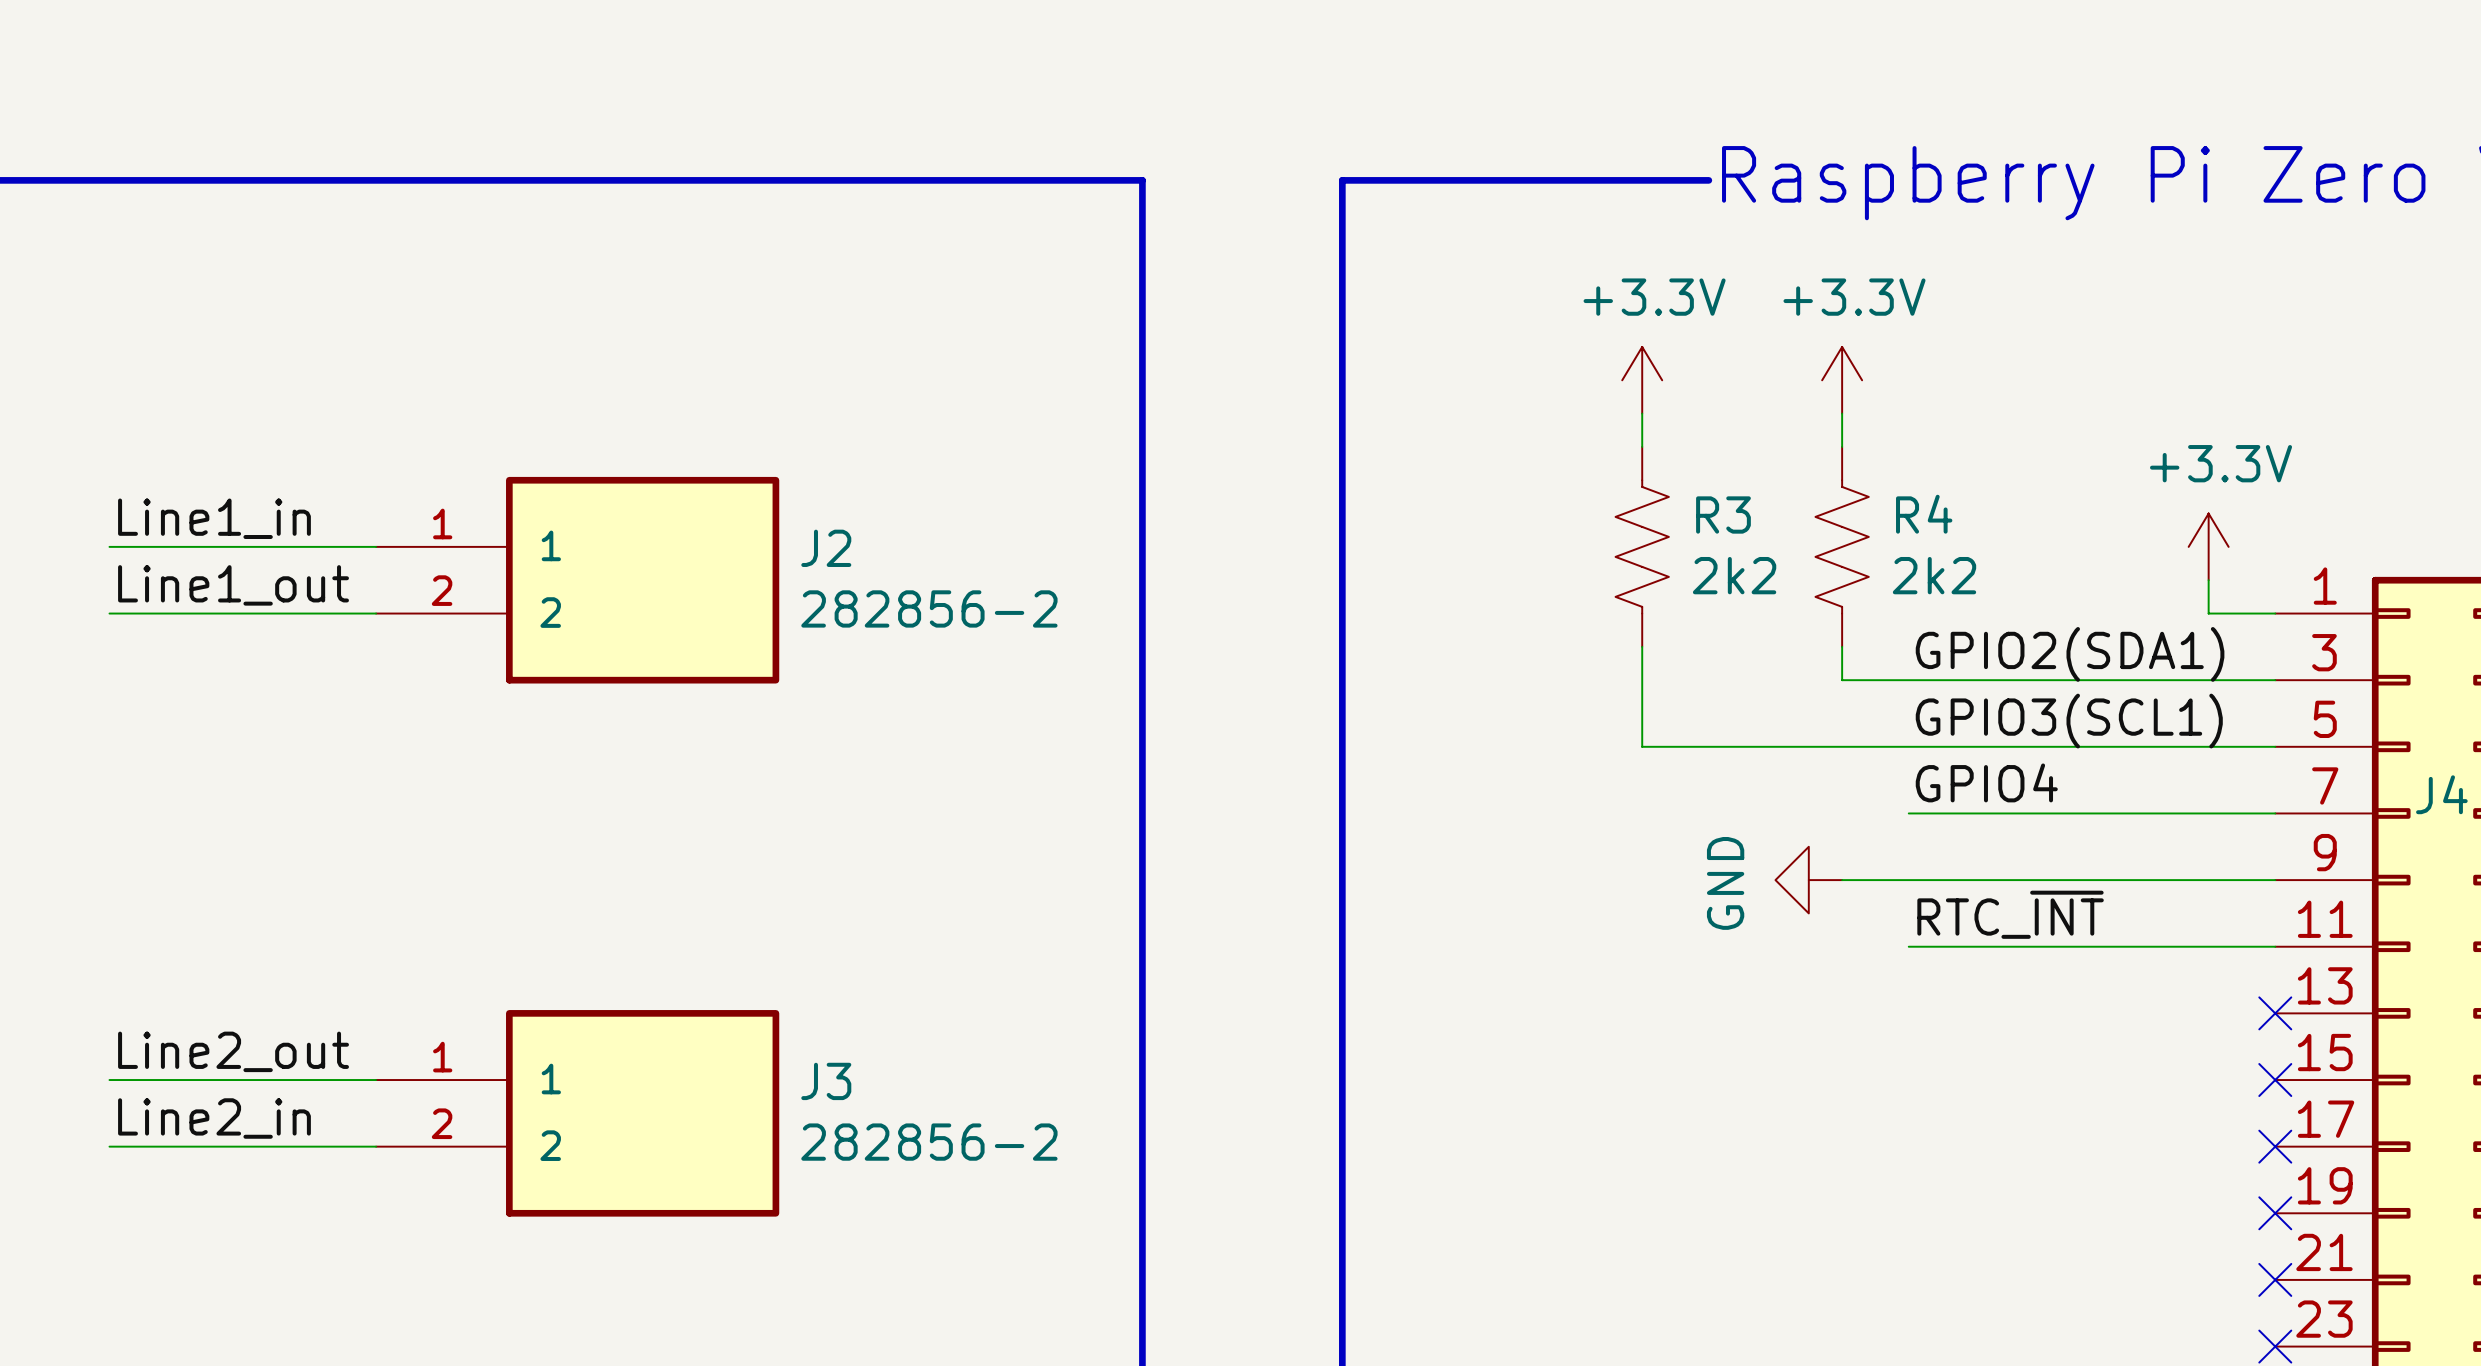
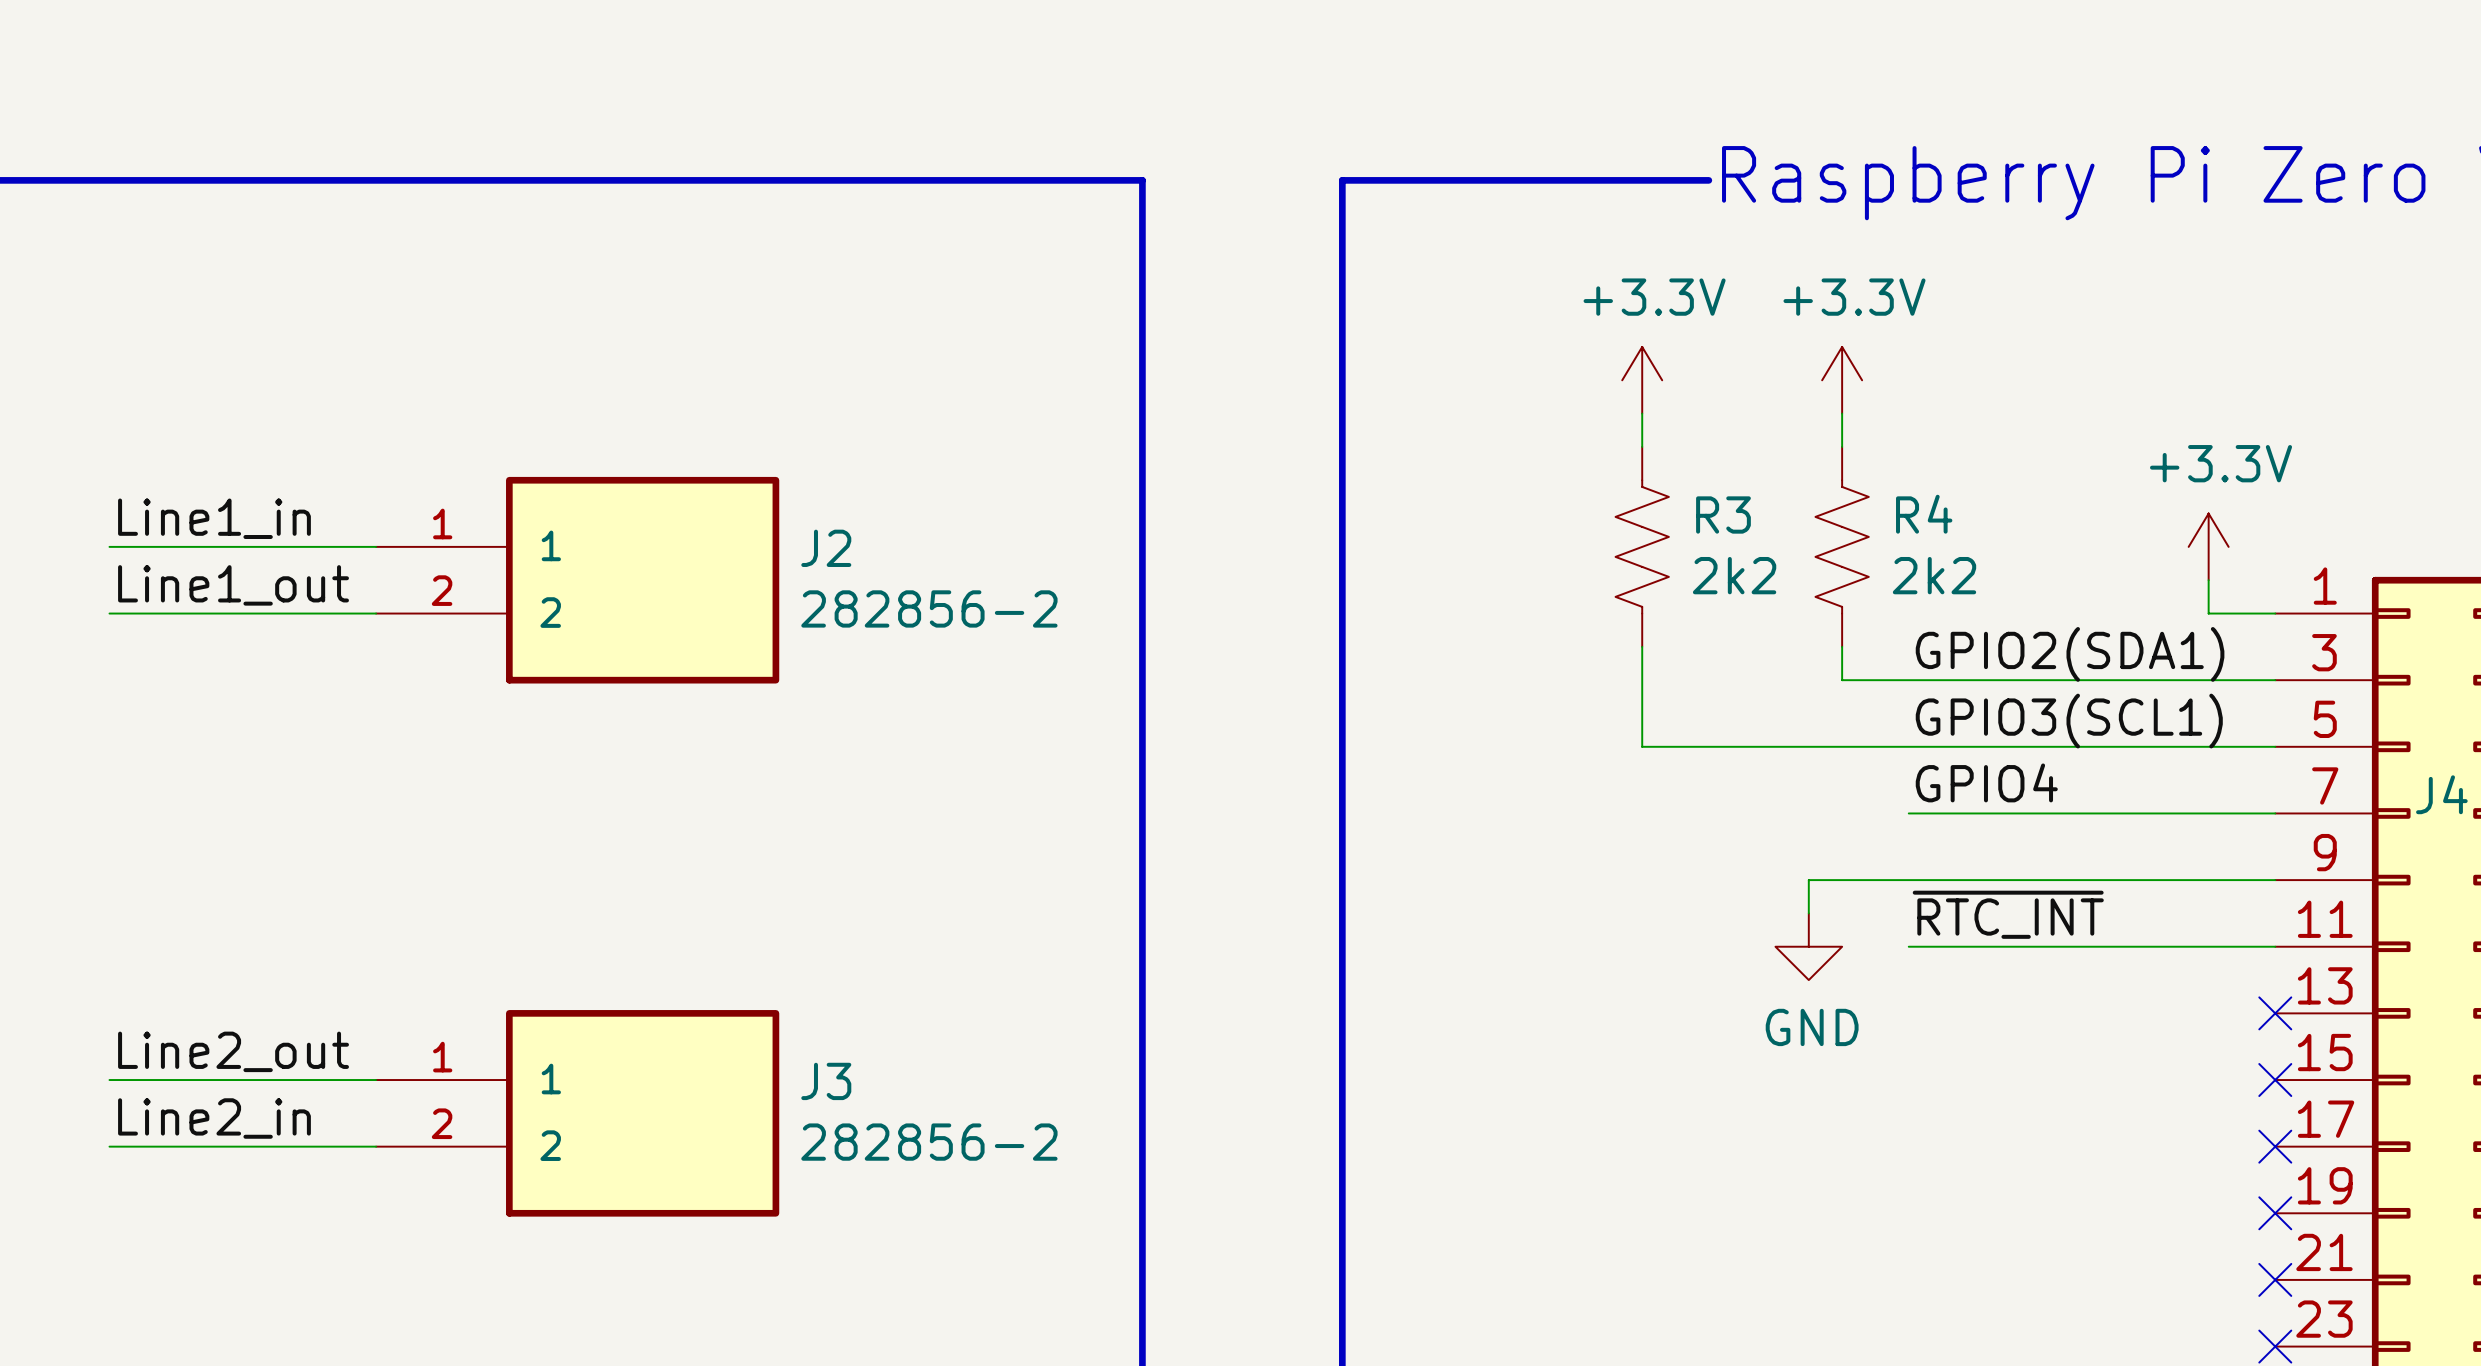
power symbol rotation: 0° (1808, 880) -> 90° counterclockwise (1808, 946)
power symbol position: GND (1808, 880) -> GND (1808, 946)
label: RTC_~{INT} (2010, 914) -> ~{RTC_INT} (2008, 914)

